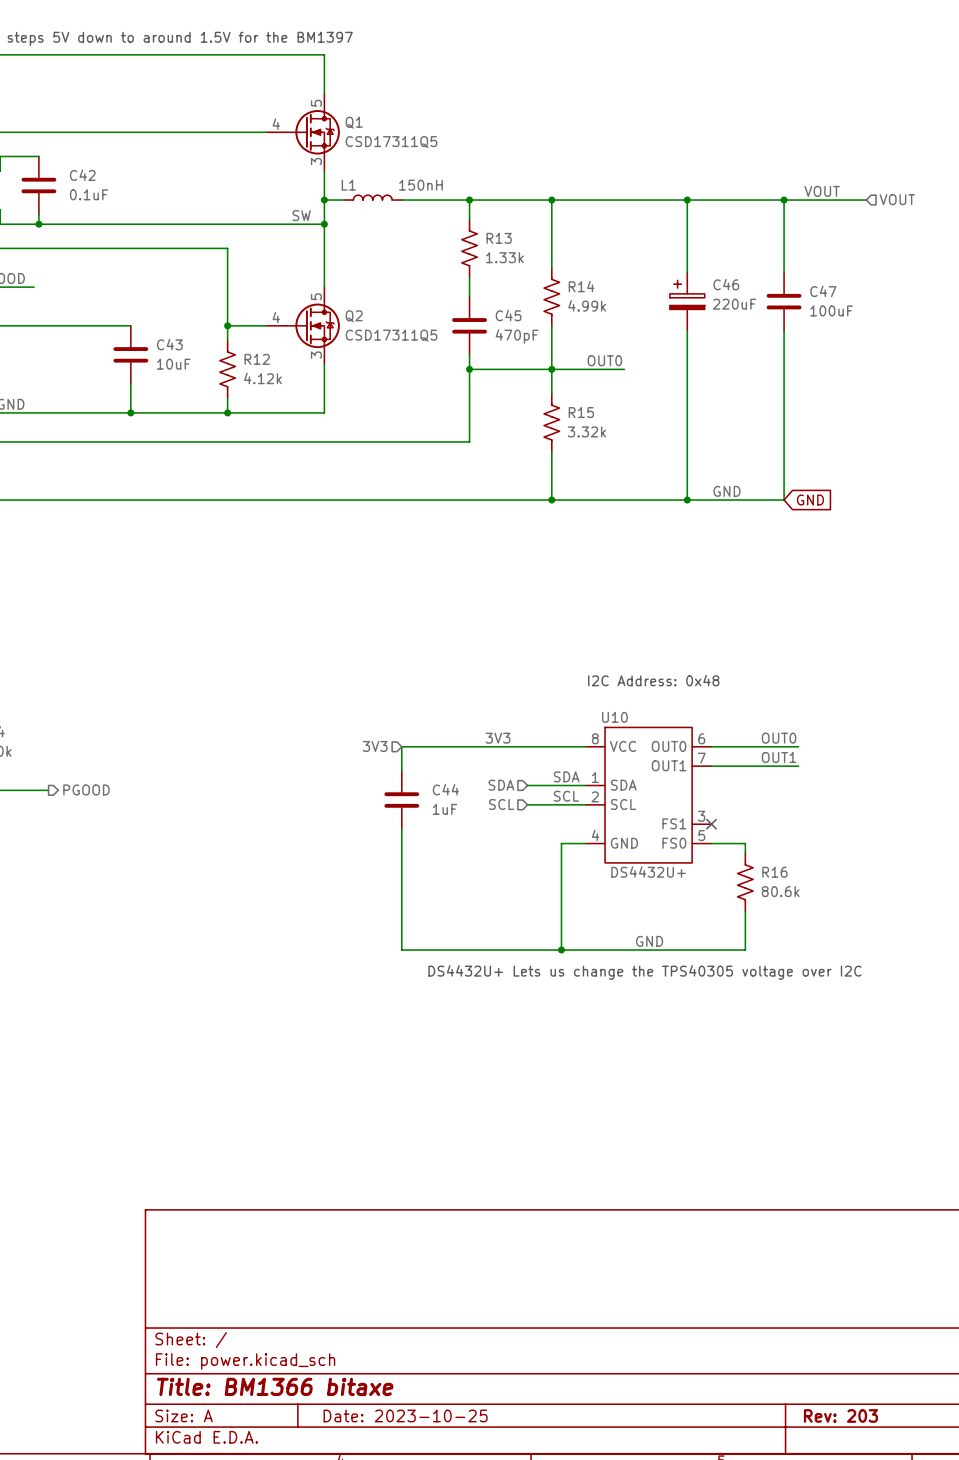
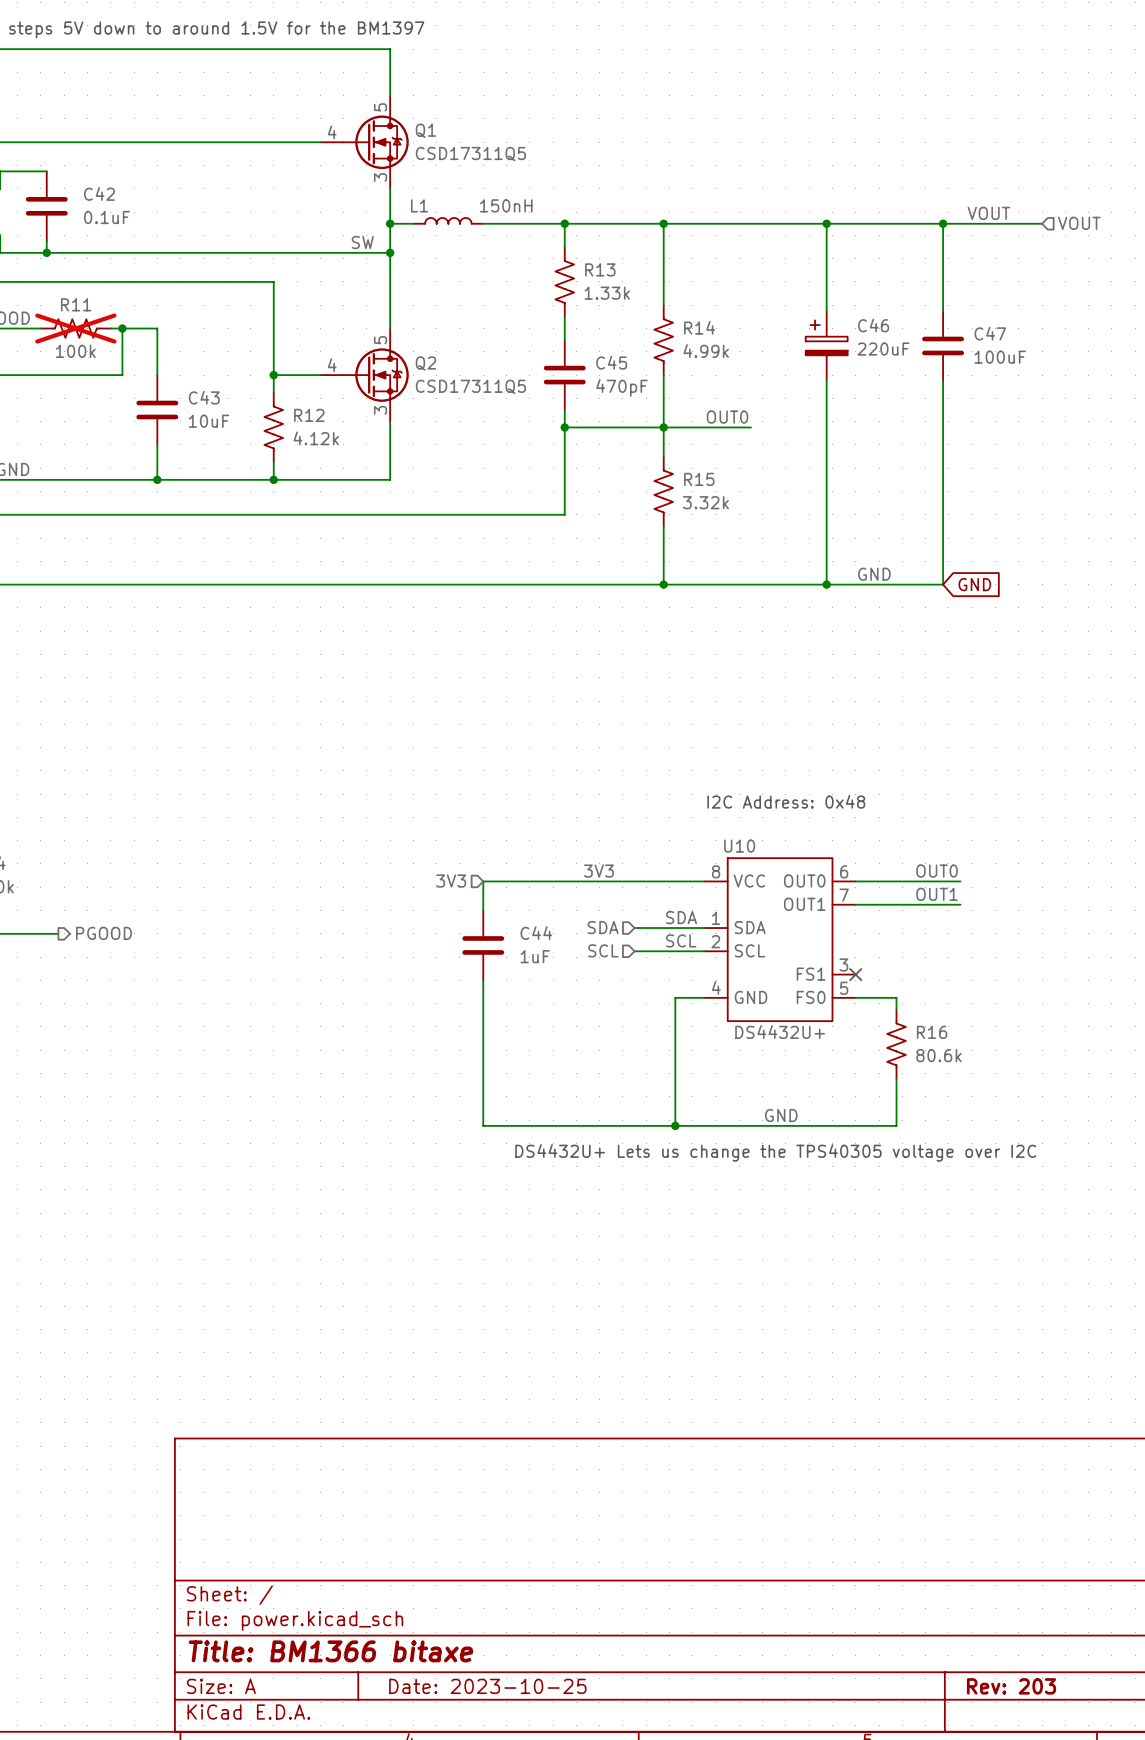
R11: none -> 100k (75, 328)
wire: none -> (122, 328) (122, 375)
junction: none -> (122, 328)
wire: (101, 325) (130, 325) -> (110, 328) (157, 328) (157, 375)

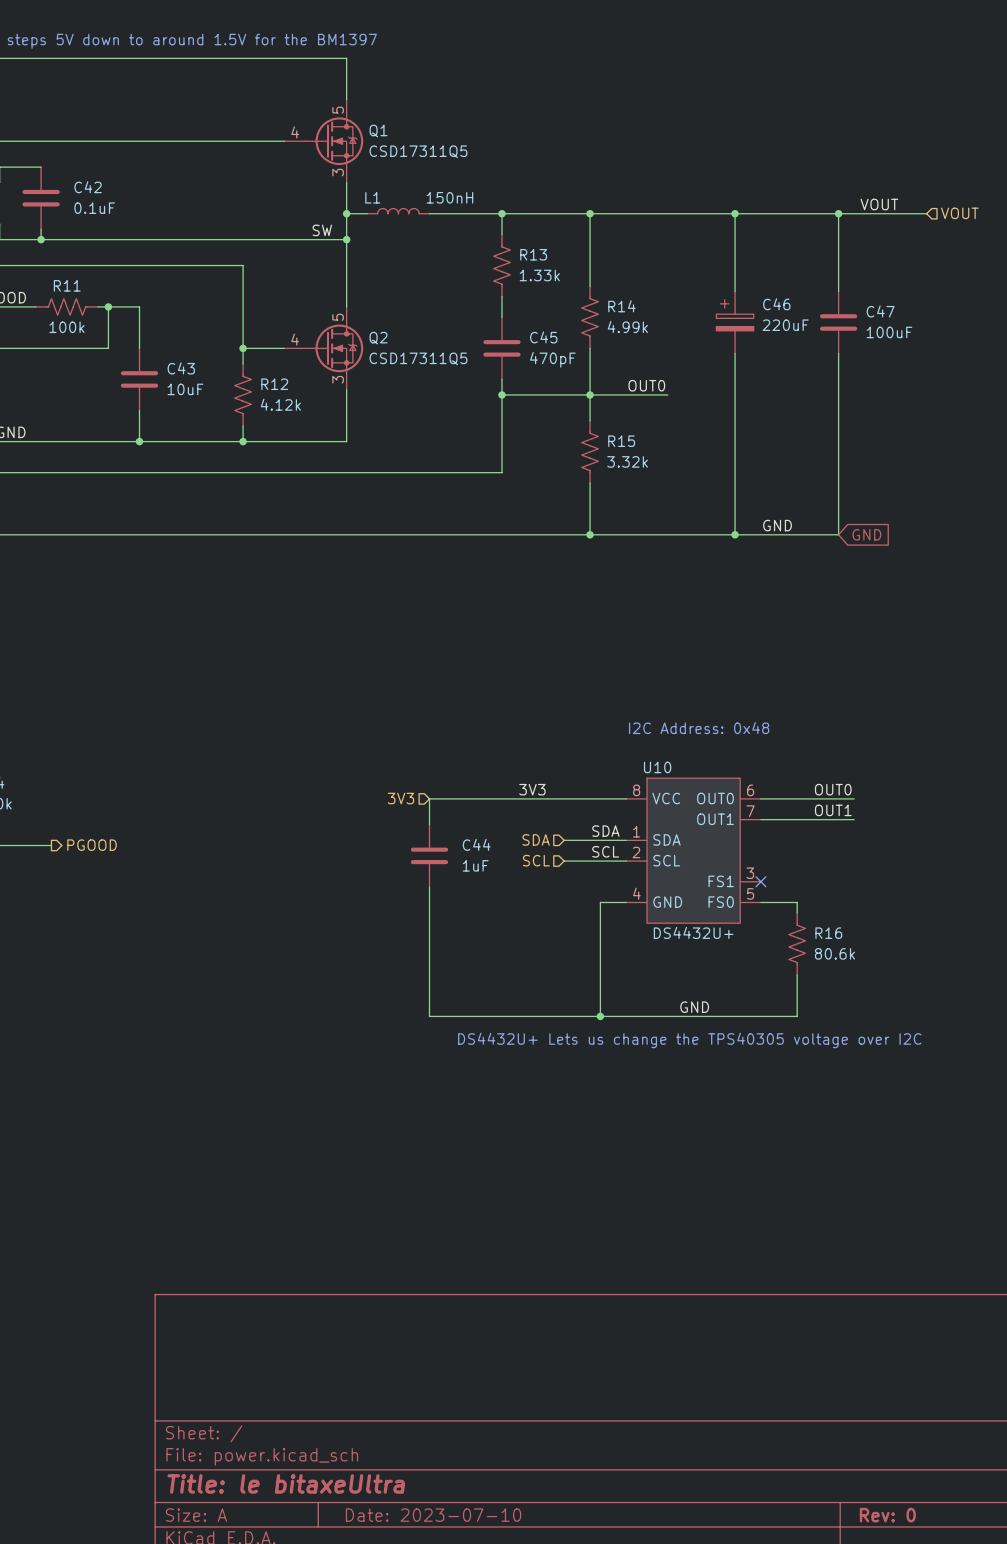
R11 do-not-place cross: (75, 328) -> none
title block: Title: BM1366 bitaxe (330, 1651) -> Title: le bitaxeUltra (286, 1483)
title block: Date: 2023-10-25 (487, 1686) -> Date: 2023-07-10 (433, 1515)
title block: Rev: 203 (1011, 1686) -> Rev: 0 (887, 1515)

